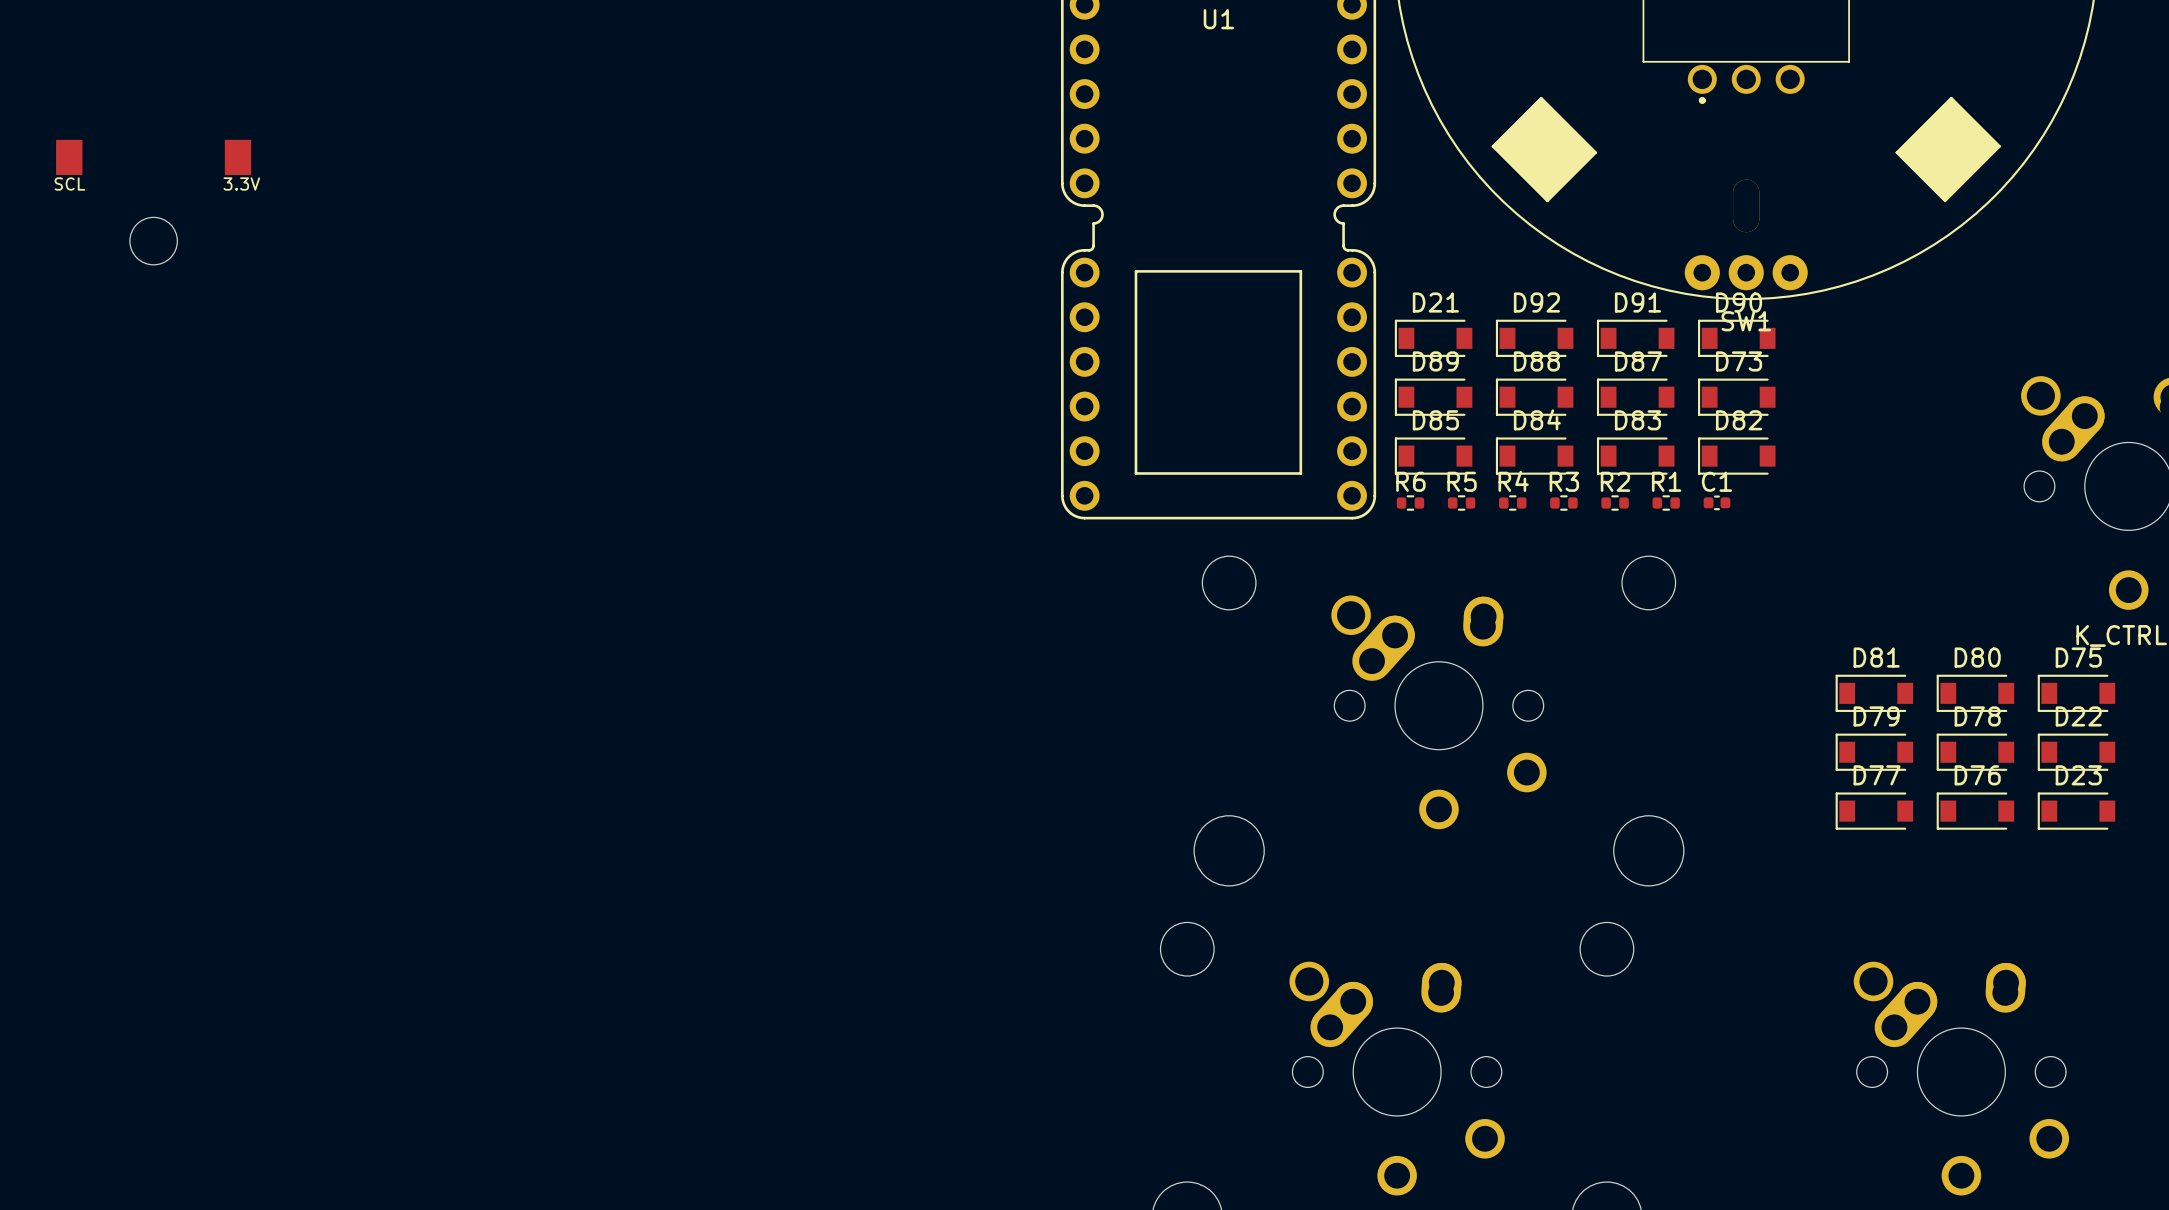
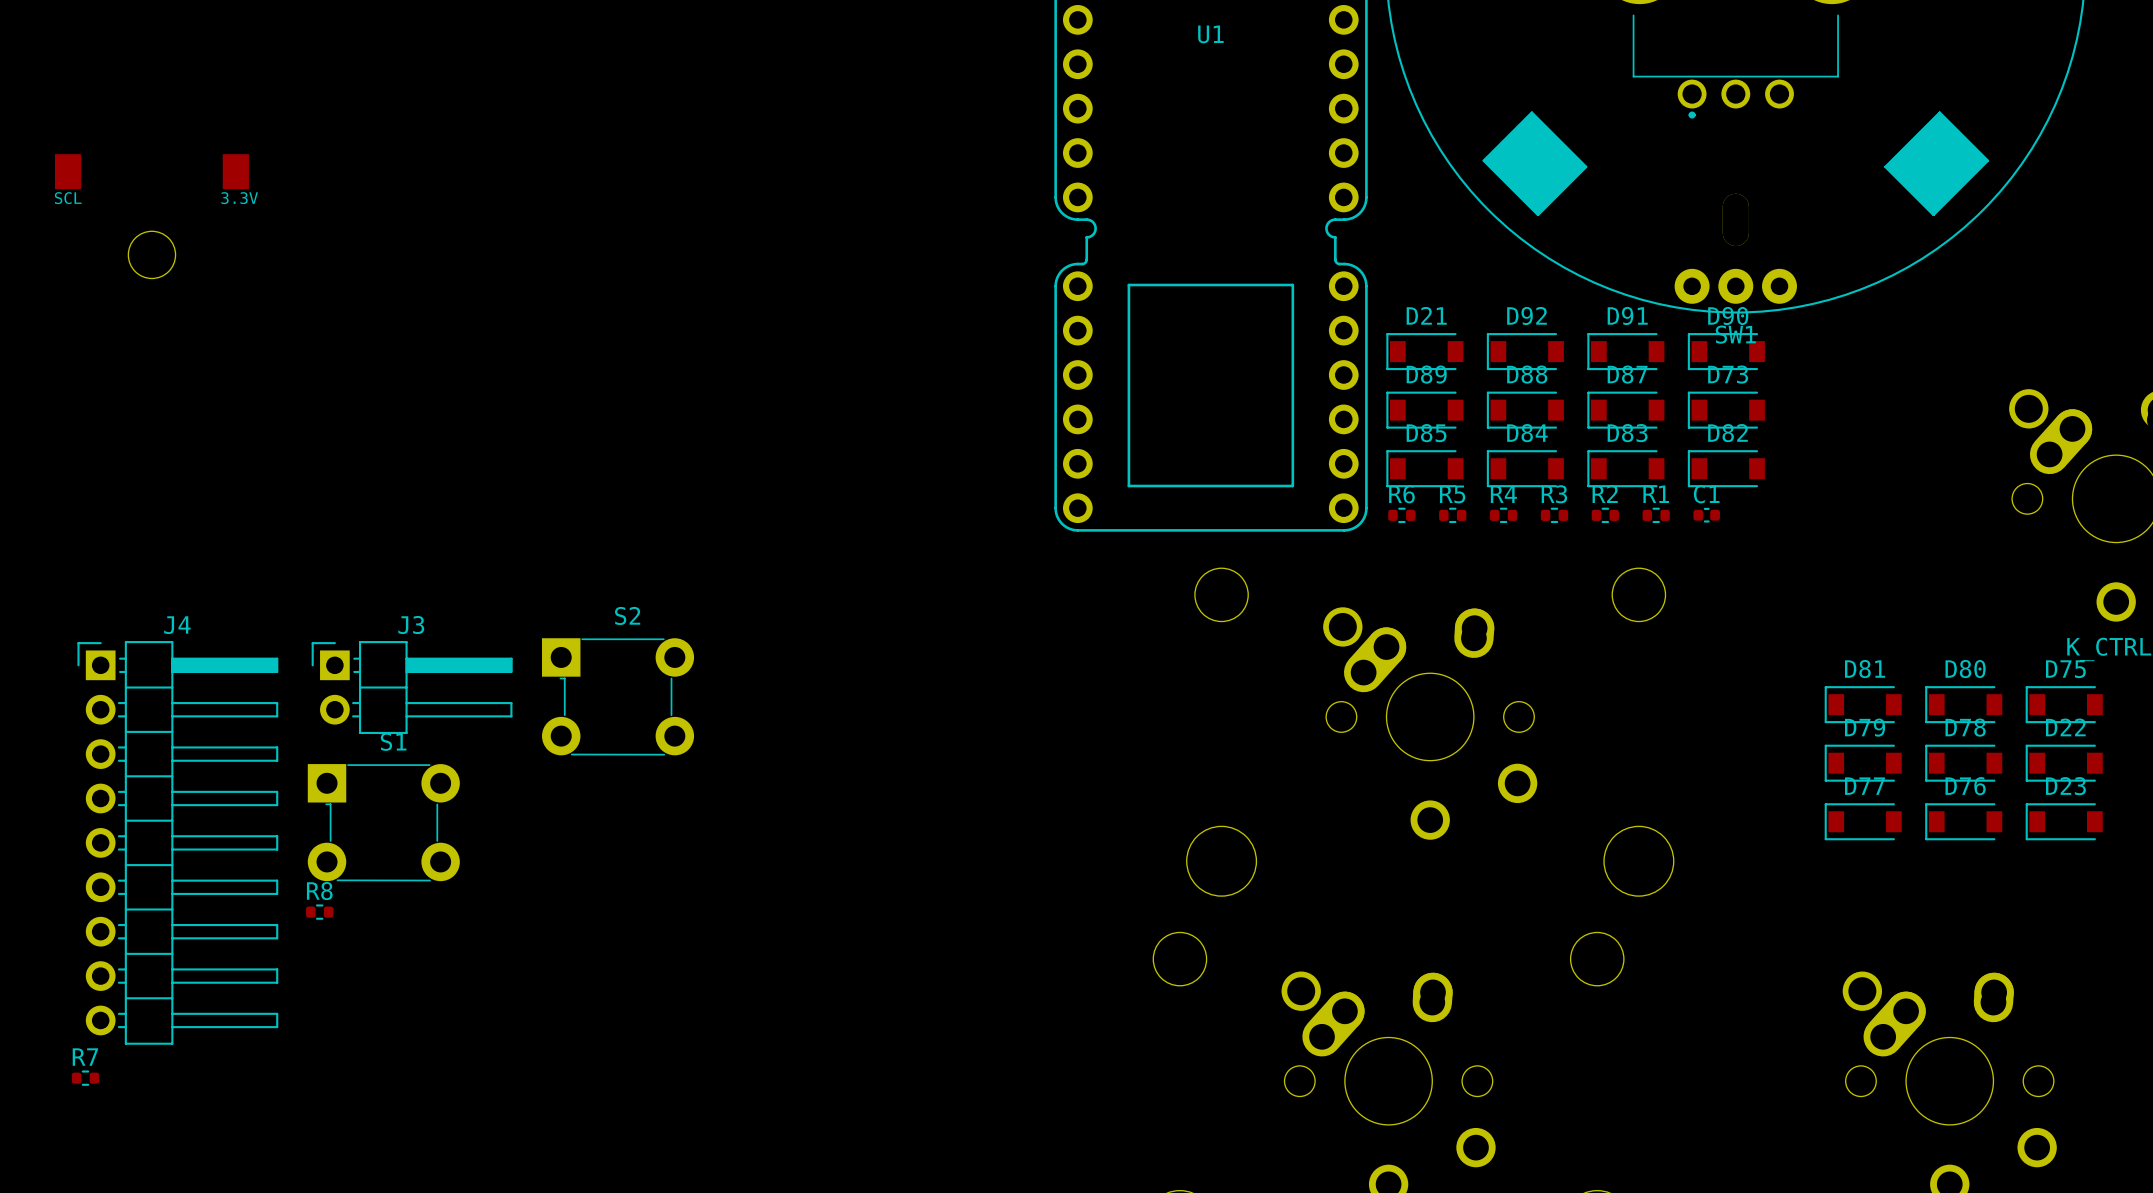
J3: none -> (412, 687)
S2: none -> (618, 696)
S1: none -> (383, 822)
J4: none -> (177, 842)
R8: none -> (319, 912)
R7: none -> (85, 1078)

